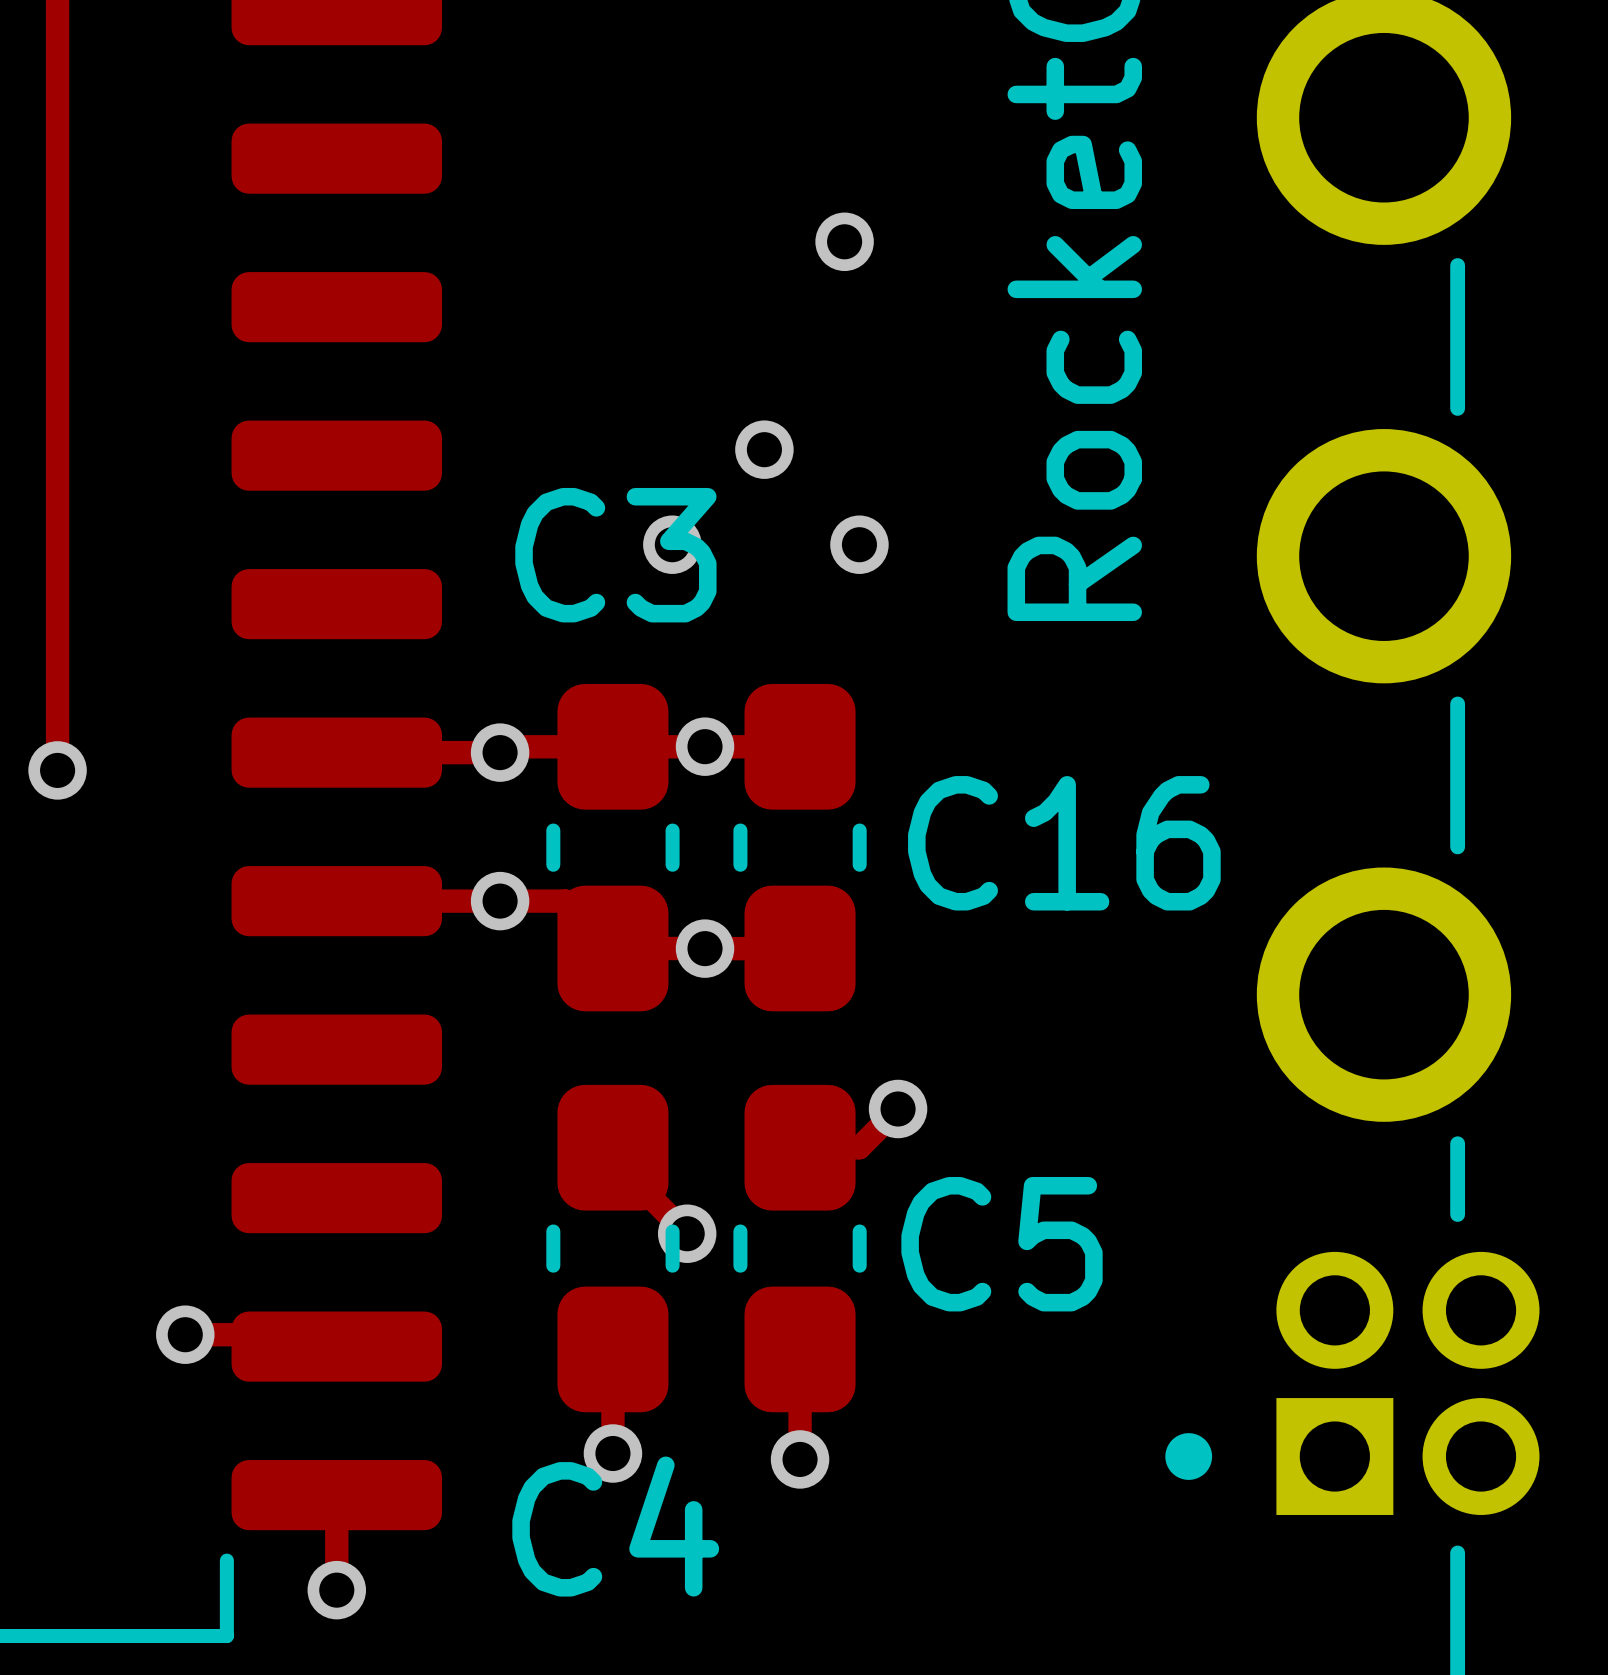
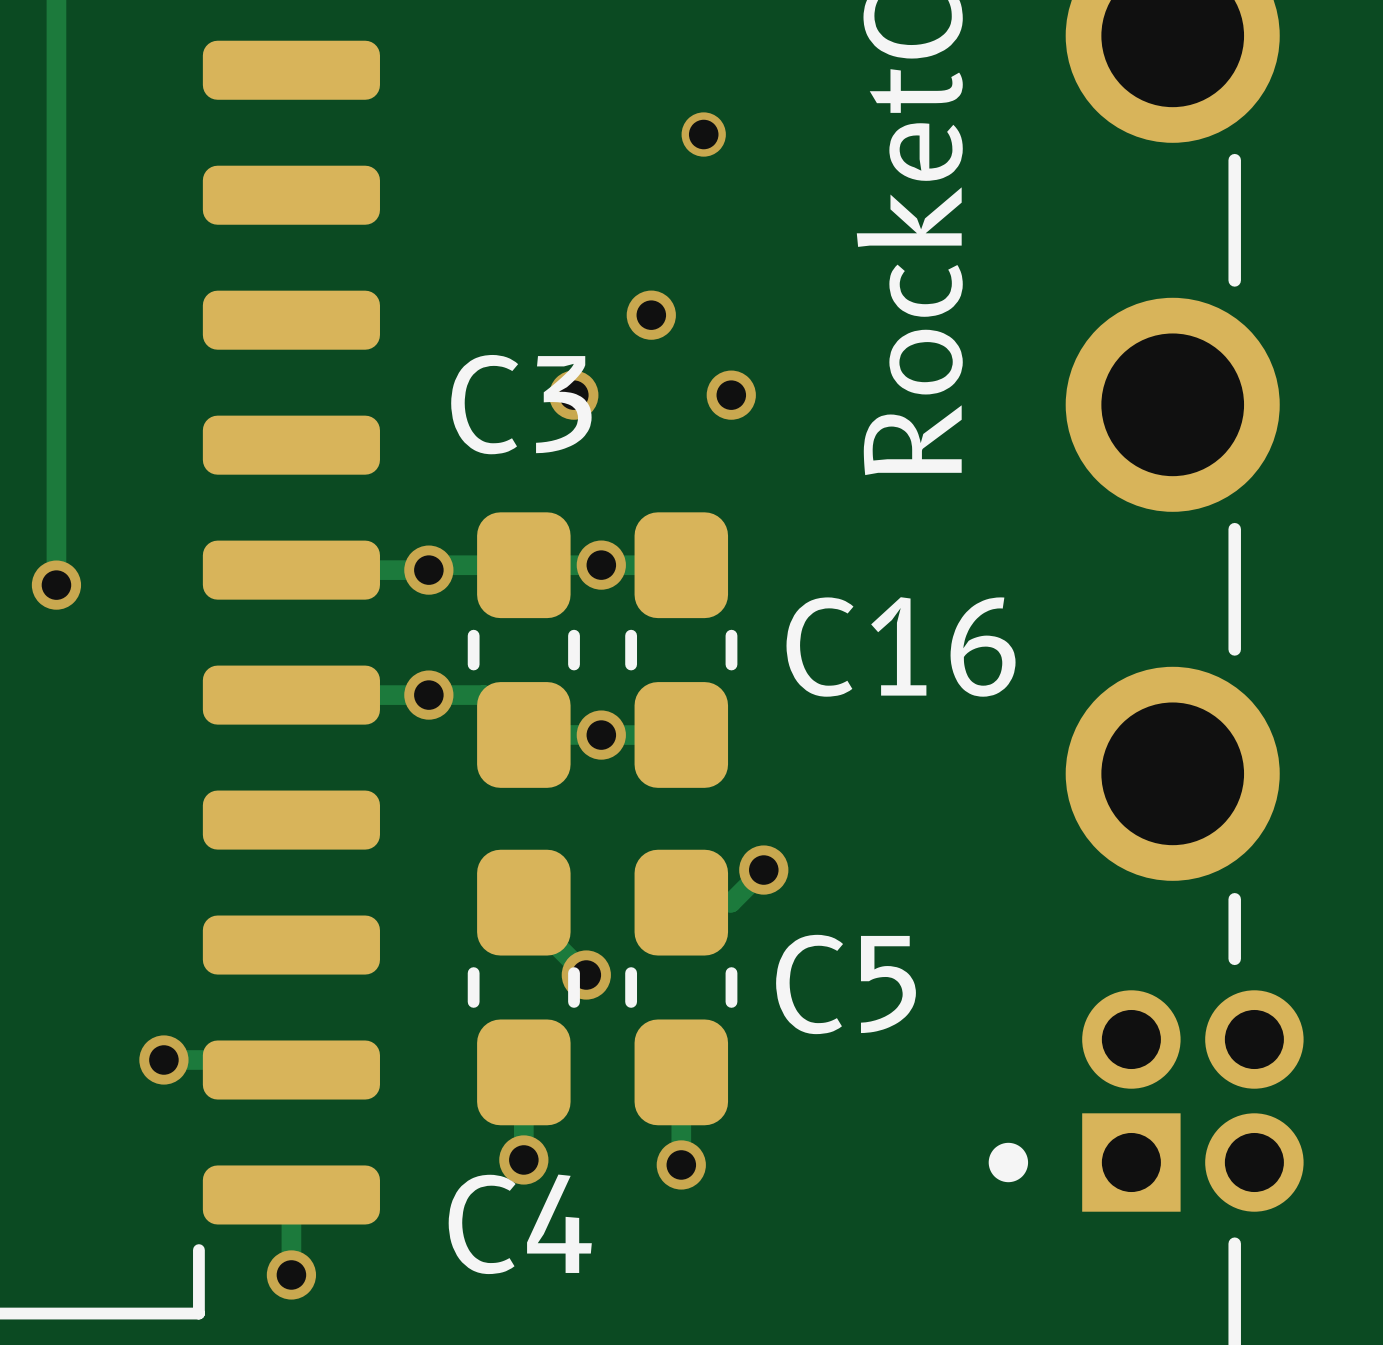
via position: (844, 241) -> (703, 134)

